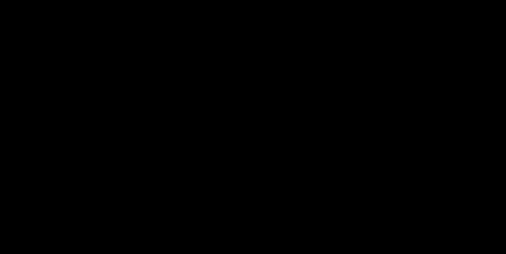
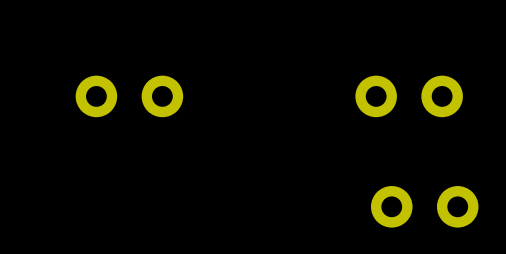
part: none -> (129, 96)
part: none -> (409, 96)
part: none -> (424, 206)

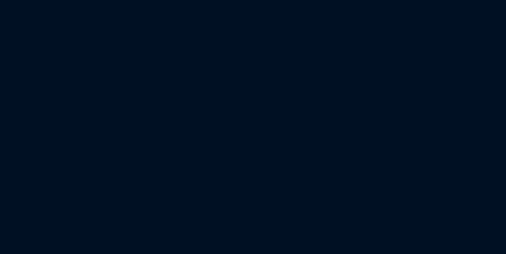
part: (129, 96) -> none
part: (409, 96) -> none
part: (424, 206) -> none

